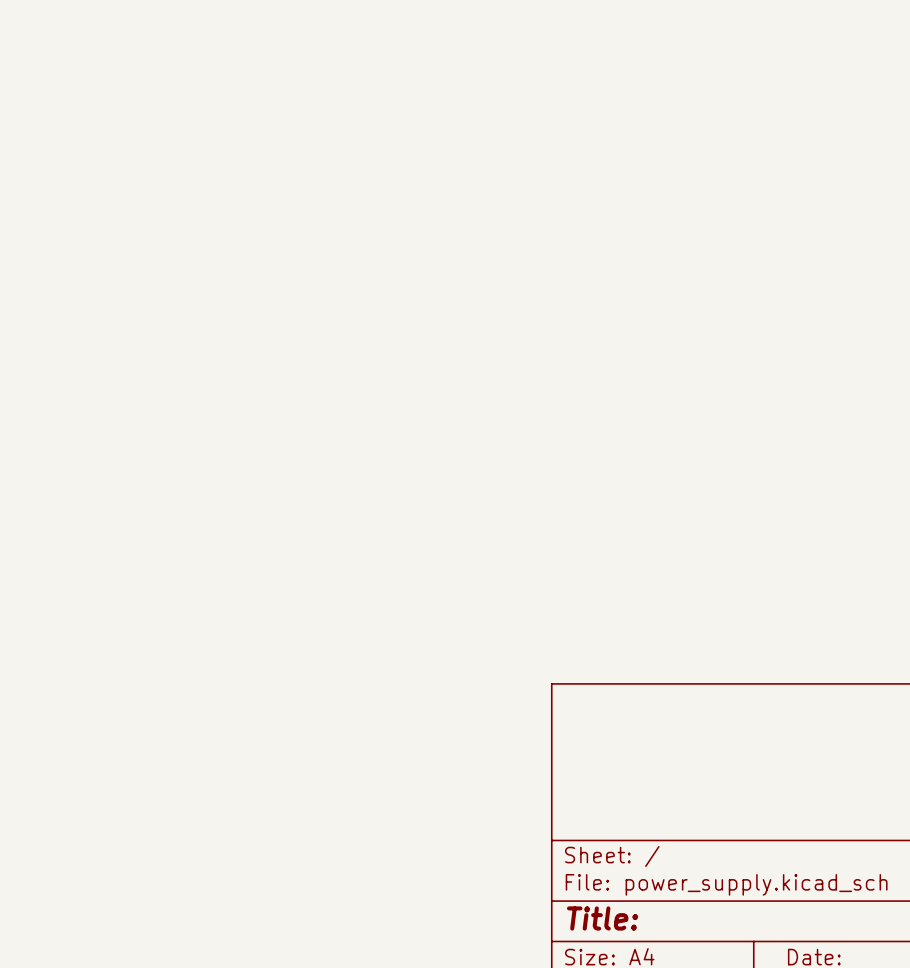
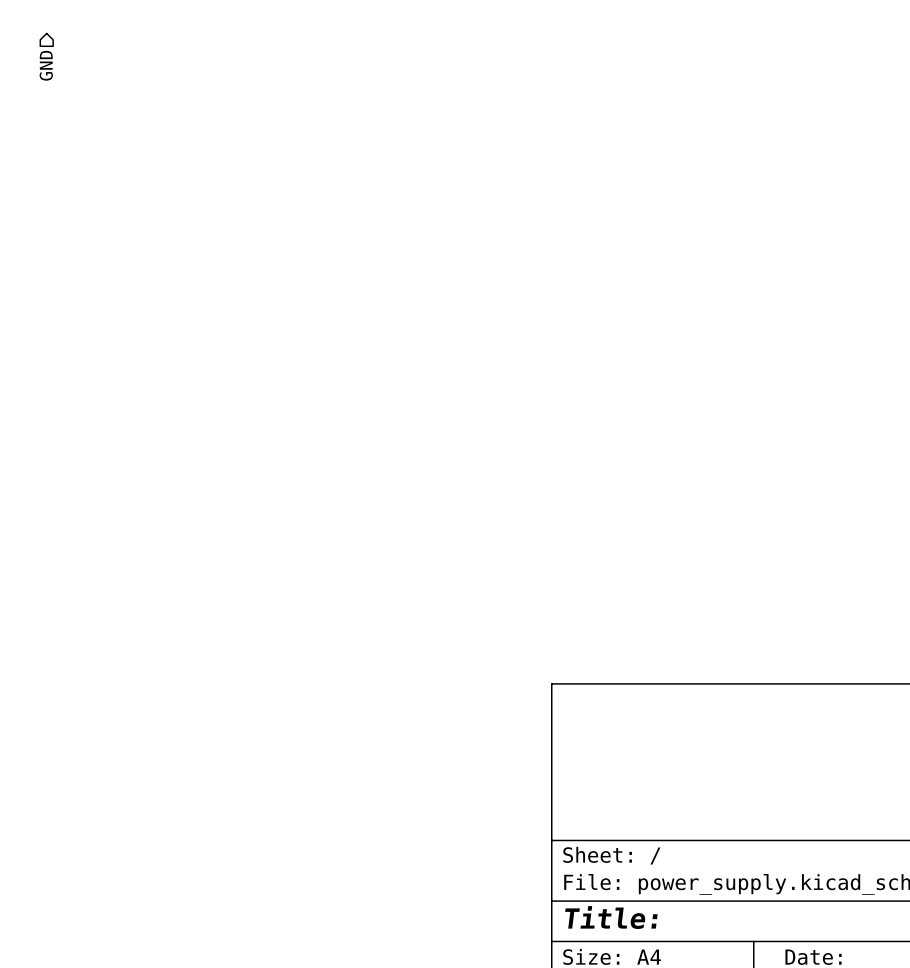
hierarchical label: none -> GND (46, 65)

